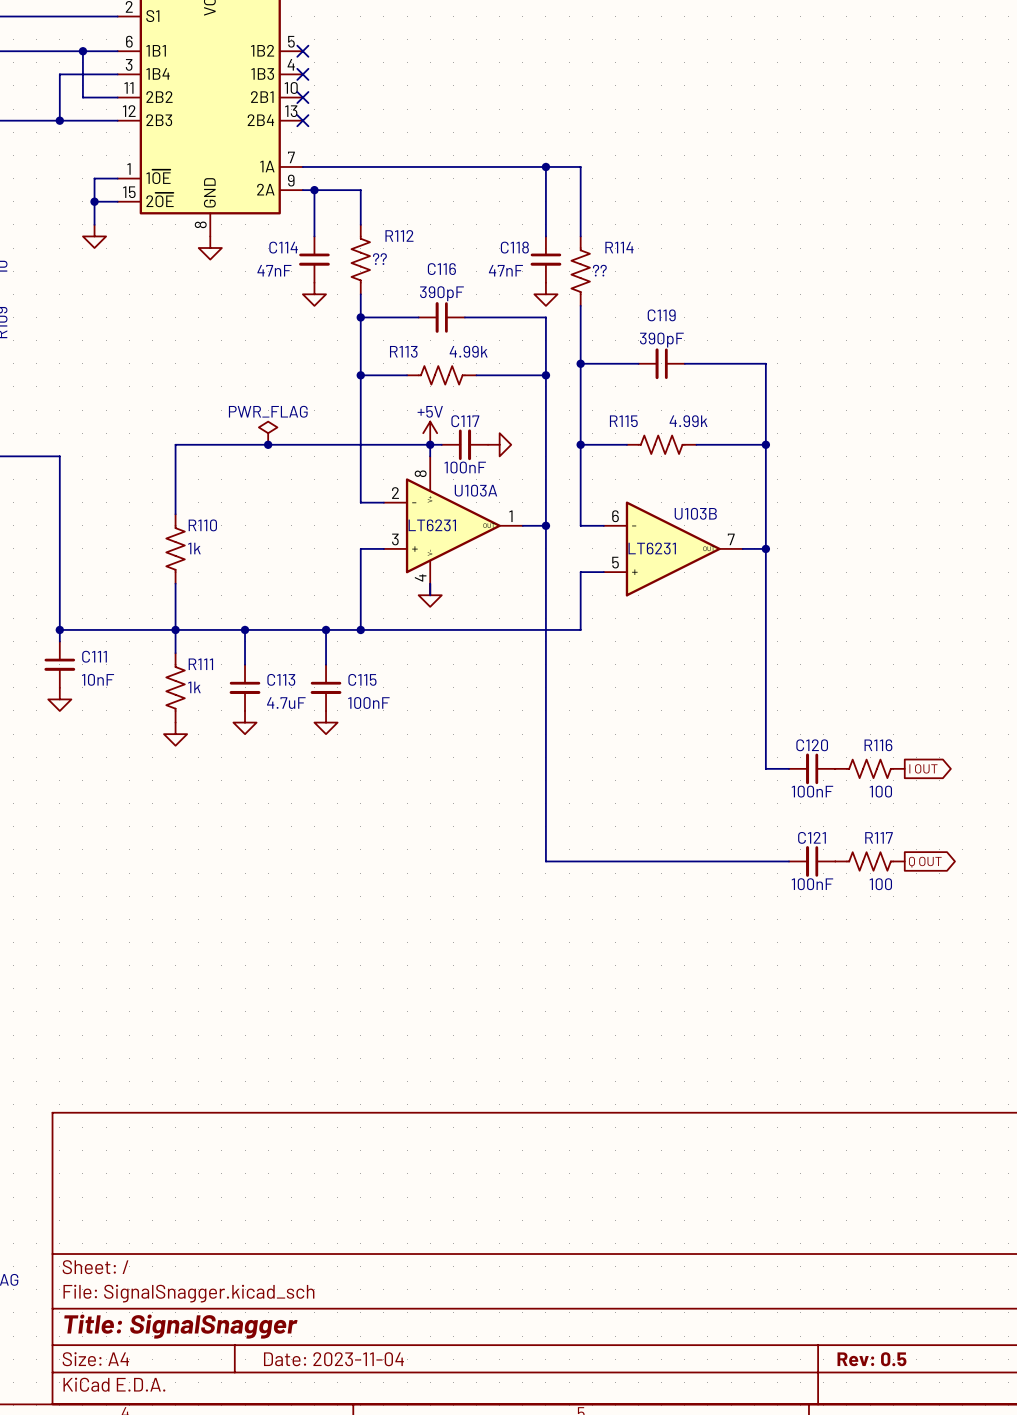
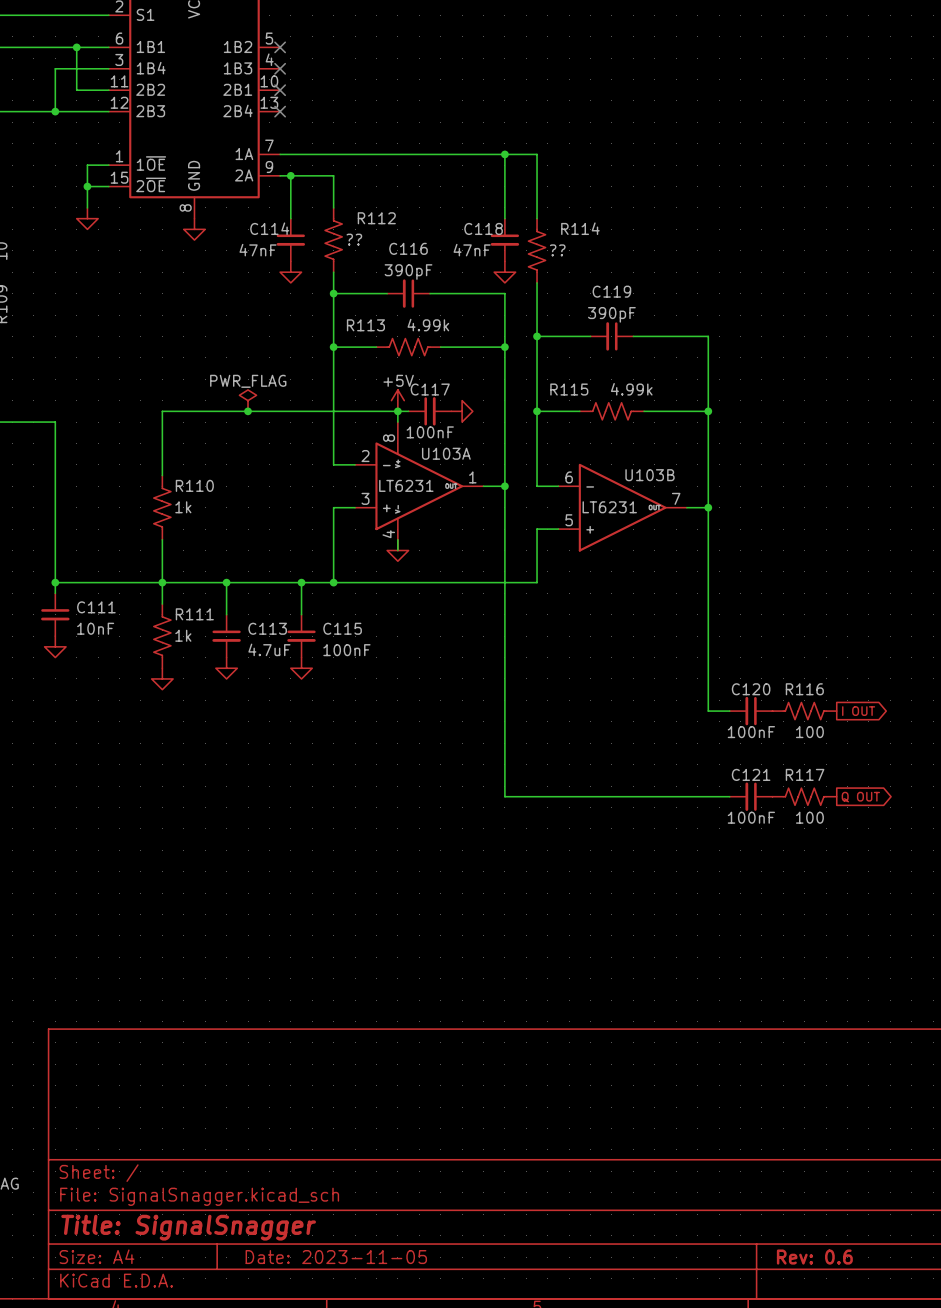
title block: Date: 2023-11-04 (333, 1359) -> Date: 2023-11-05 (336, 1257)
title block: Rev: 0.5 (871, 1359) -> Rev: 0.6 (814, 1257)

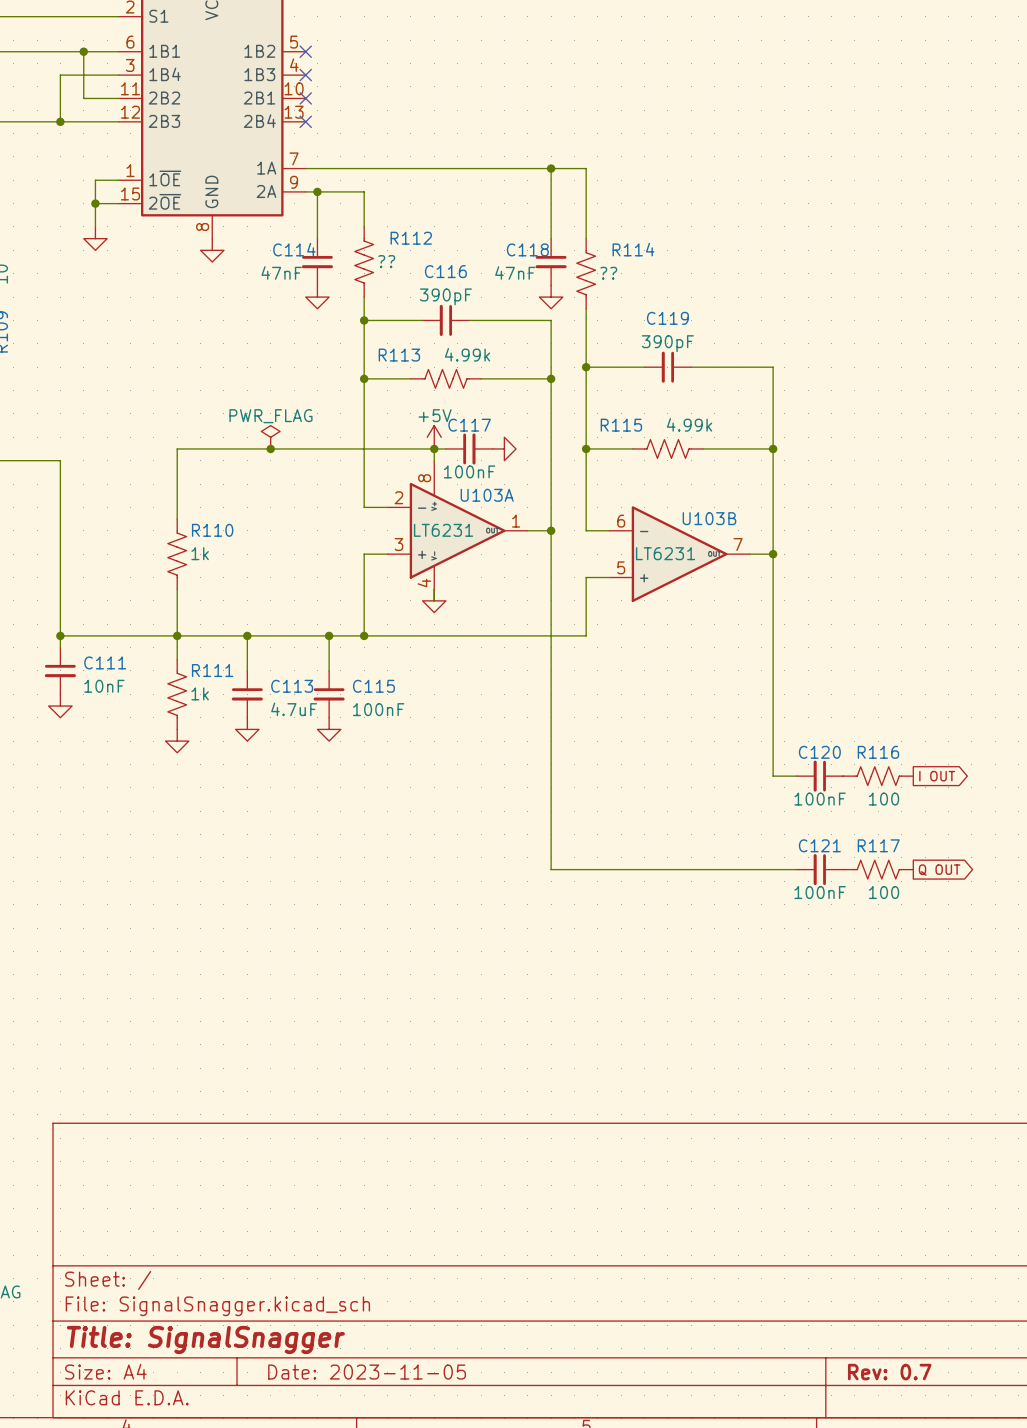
title block: Rev: 0.6 (814, 1257) -> Rev: 0.7 (889, 1372)

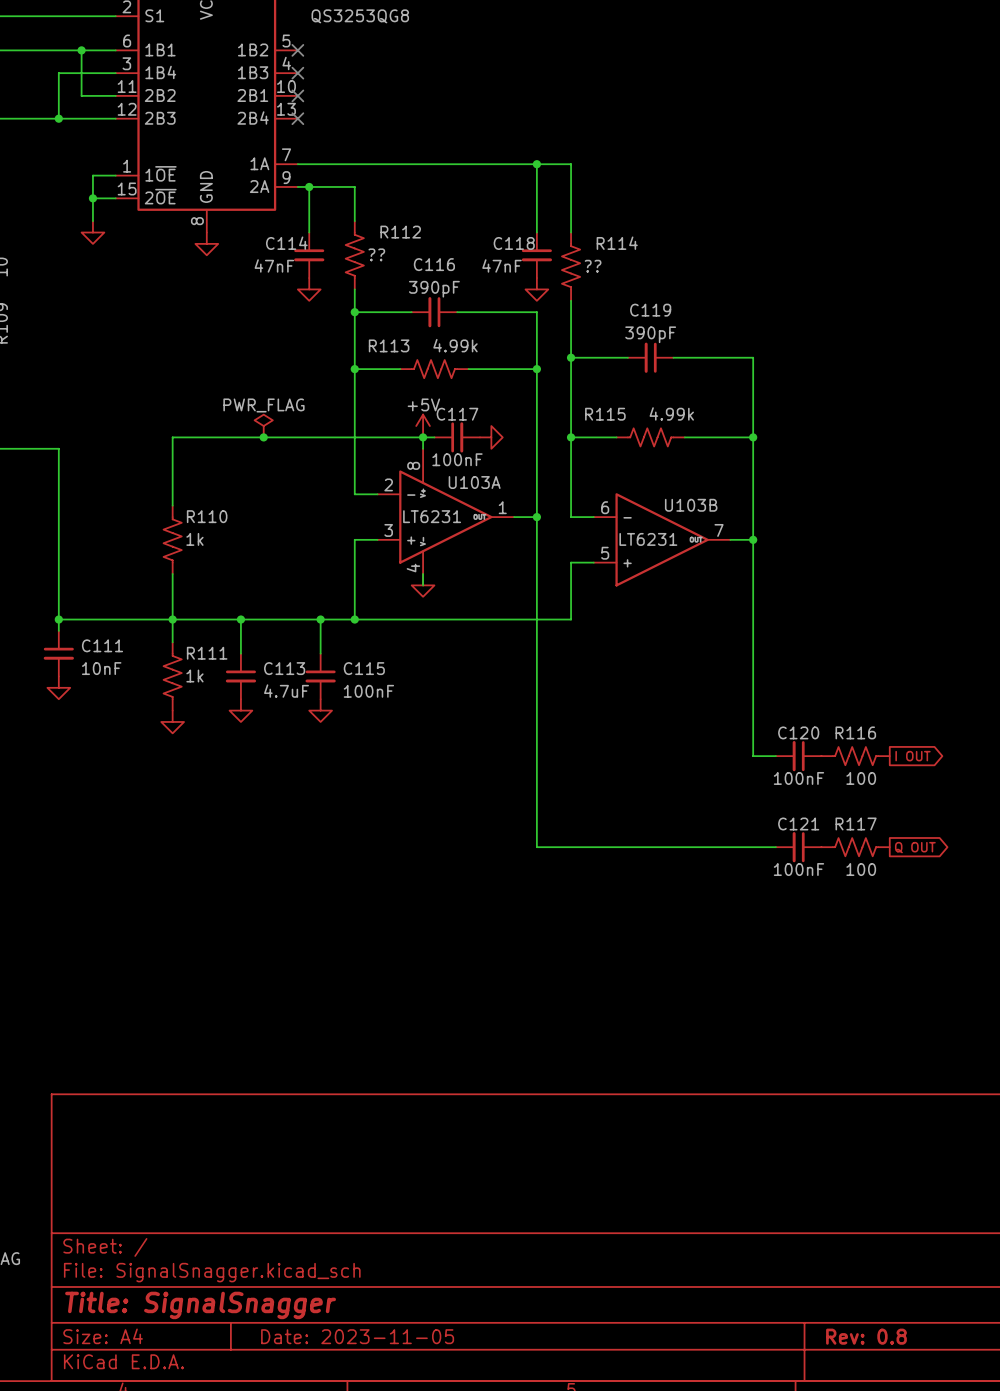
part value: none -> QS3253QG8 (360, 16)
title block: Rev: 0.7 (889, 1372) -> Rev: 0.8 (866, 1336)

